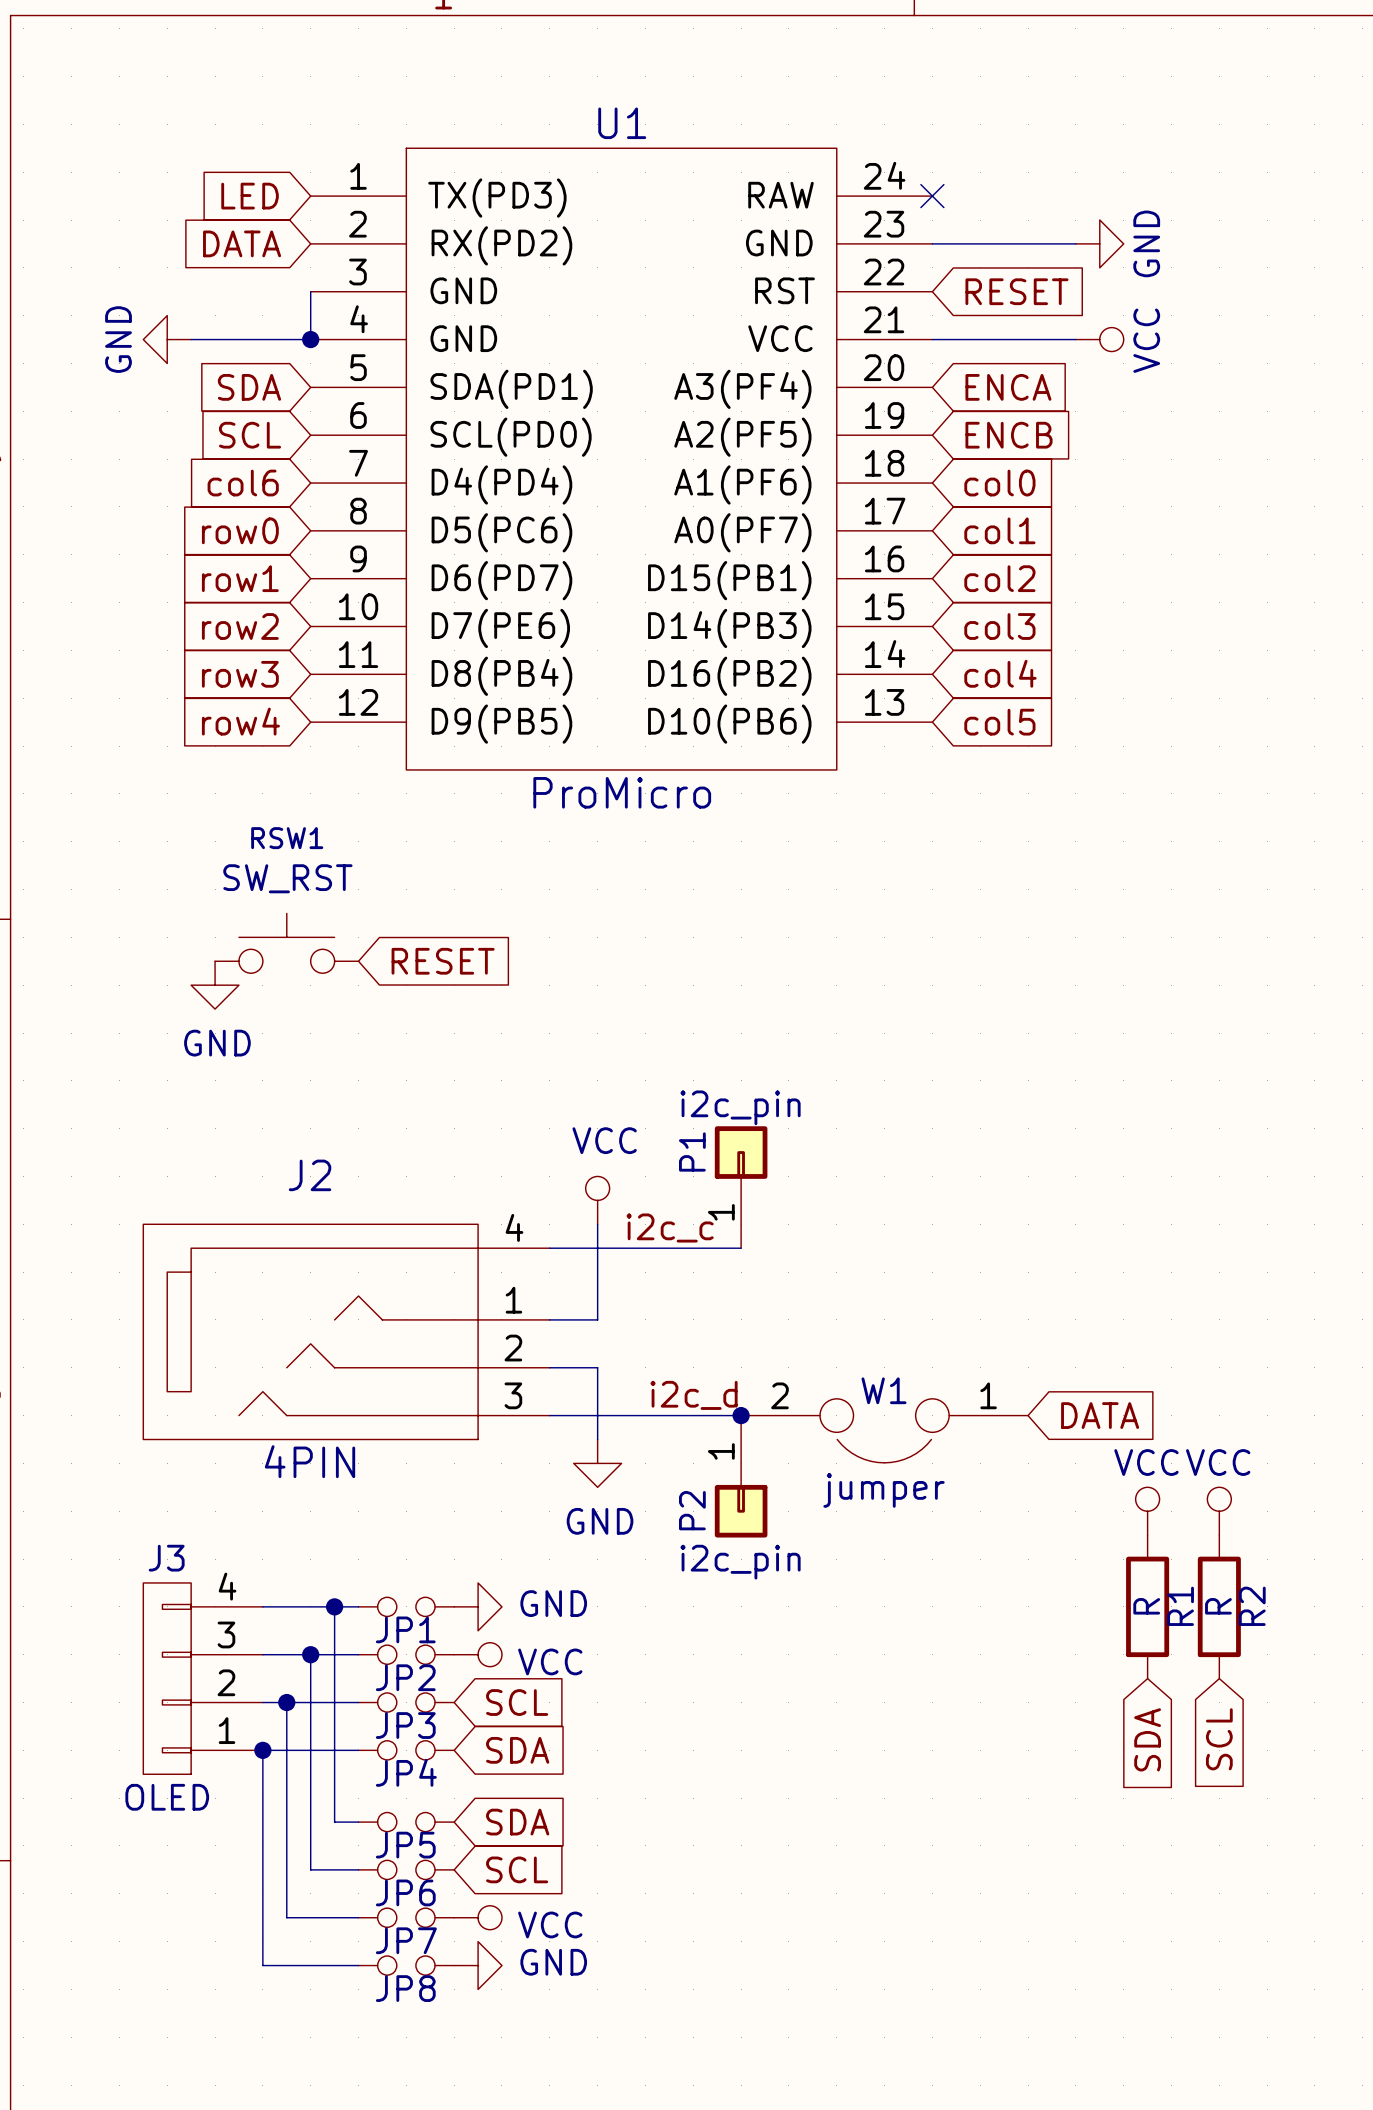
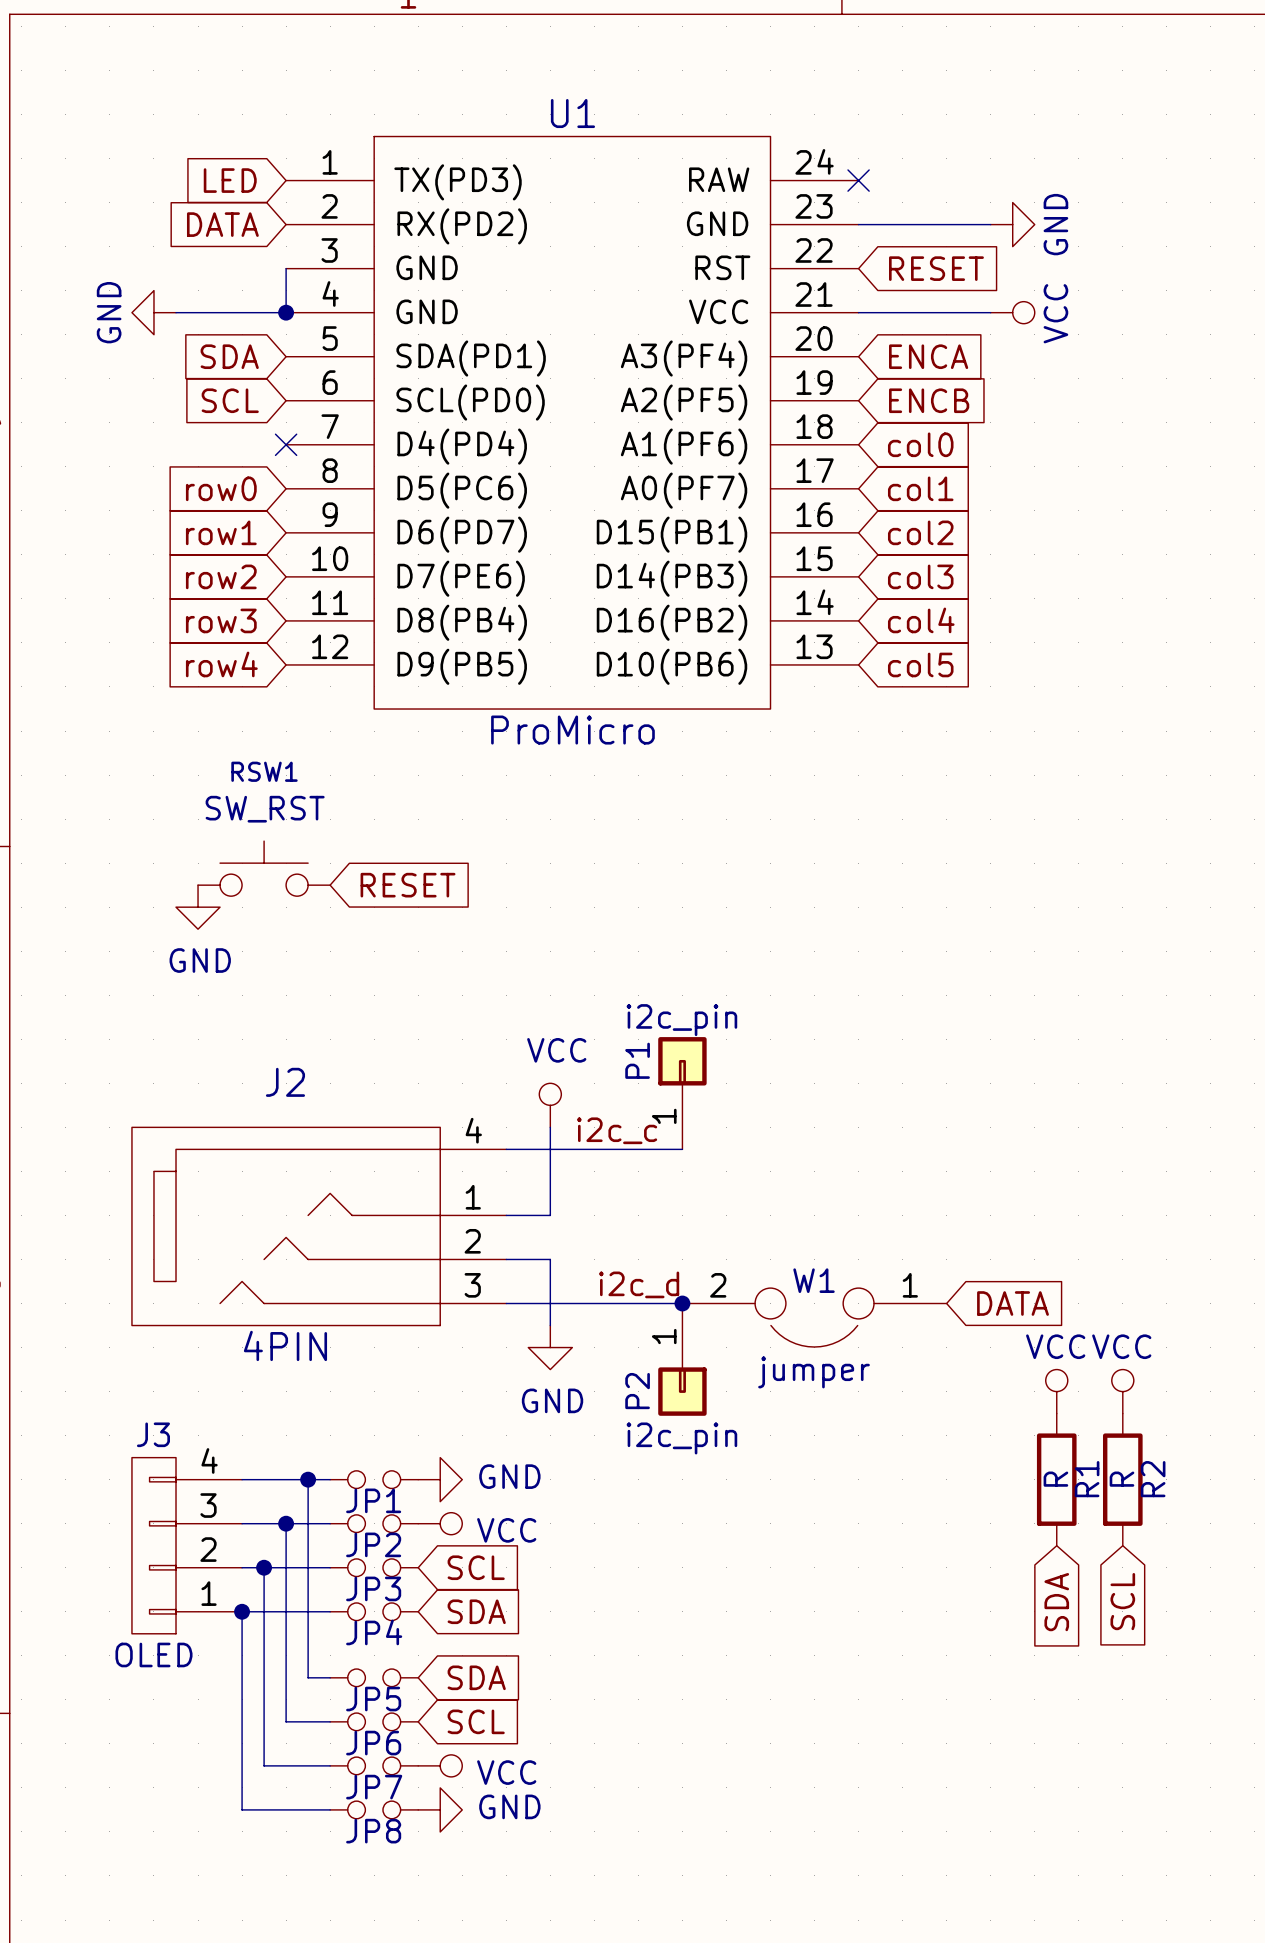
global label: col6 (243, 483) -> none
no-connect mark: none -> (286, 444)

